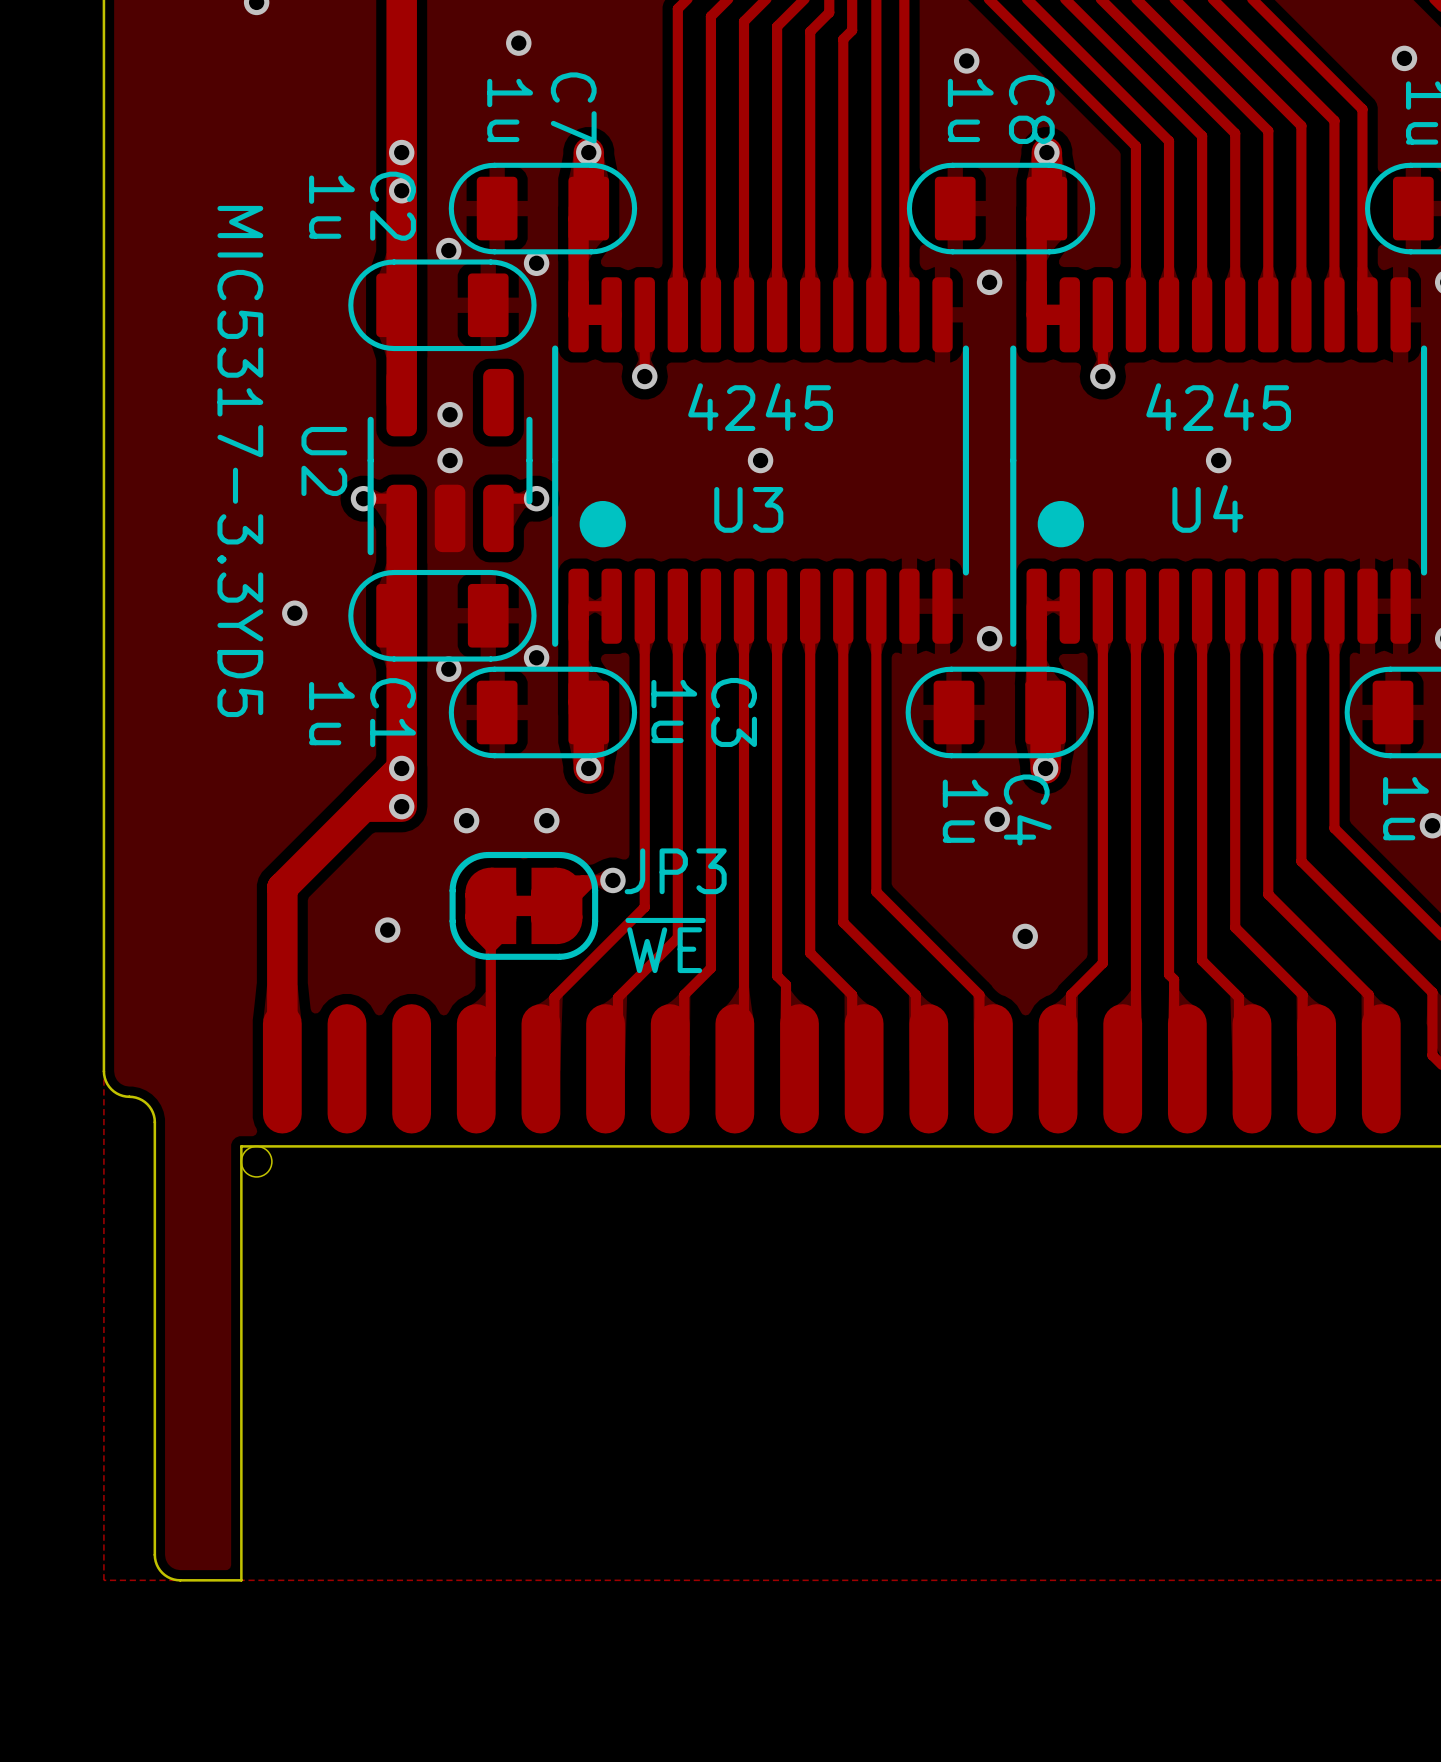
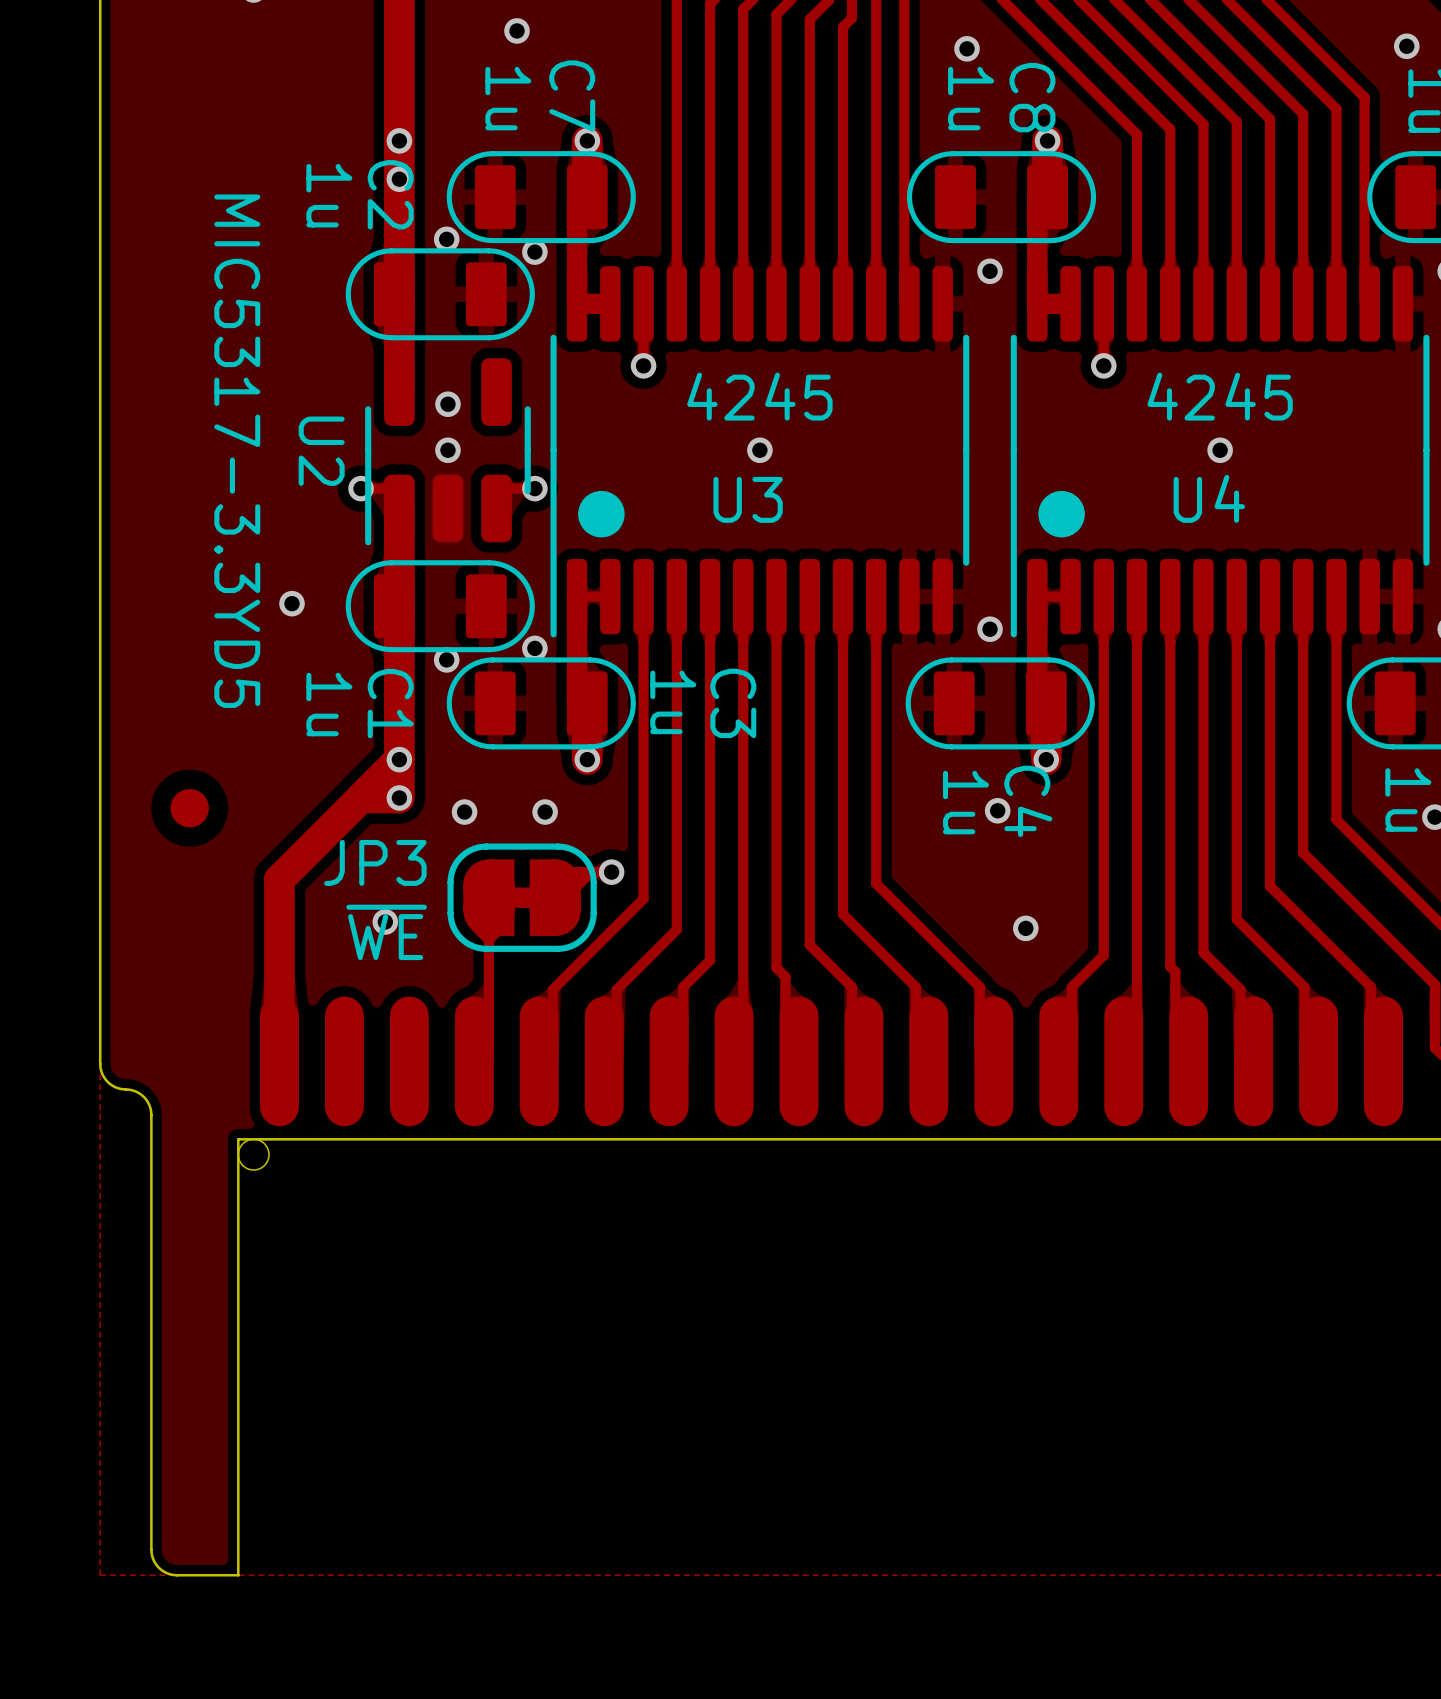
part: none -> (189, 808)
JP3 name position: JP3 (675, 871) -> JP3 (375, 862)
JP3 value position: ~{WE} (665, 945) -> ~{WE} (386, 932)

